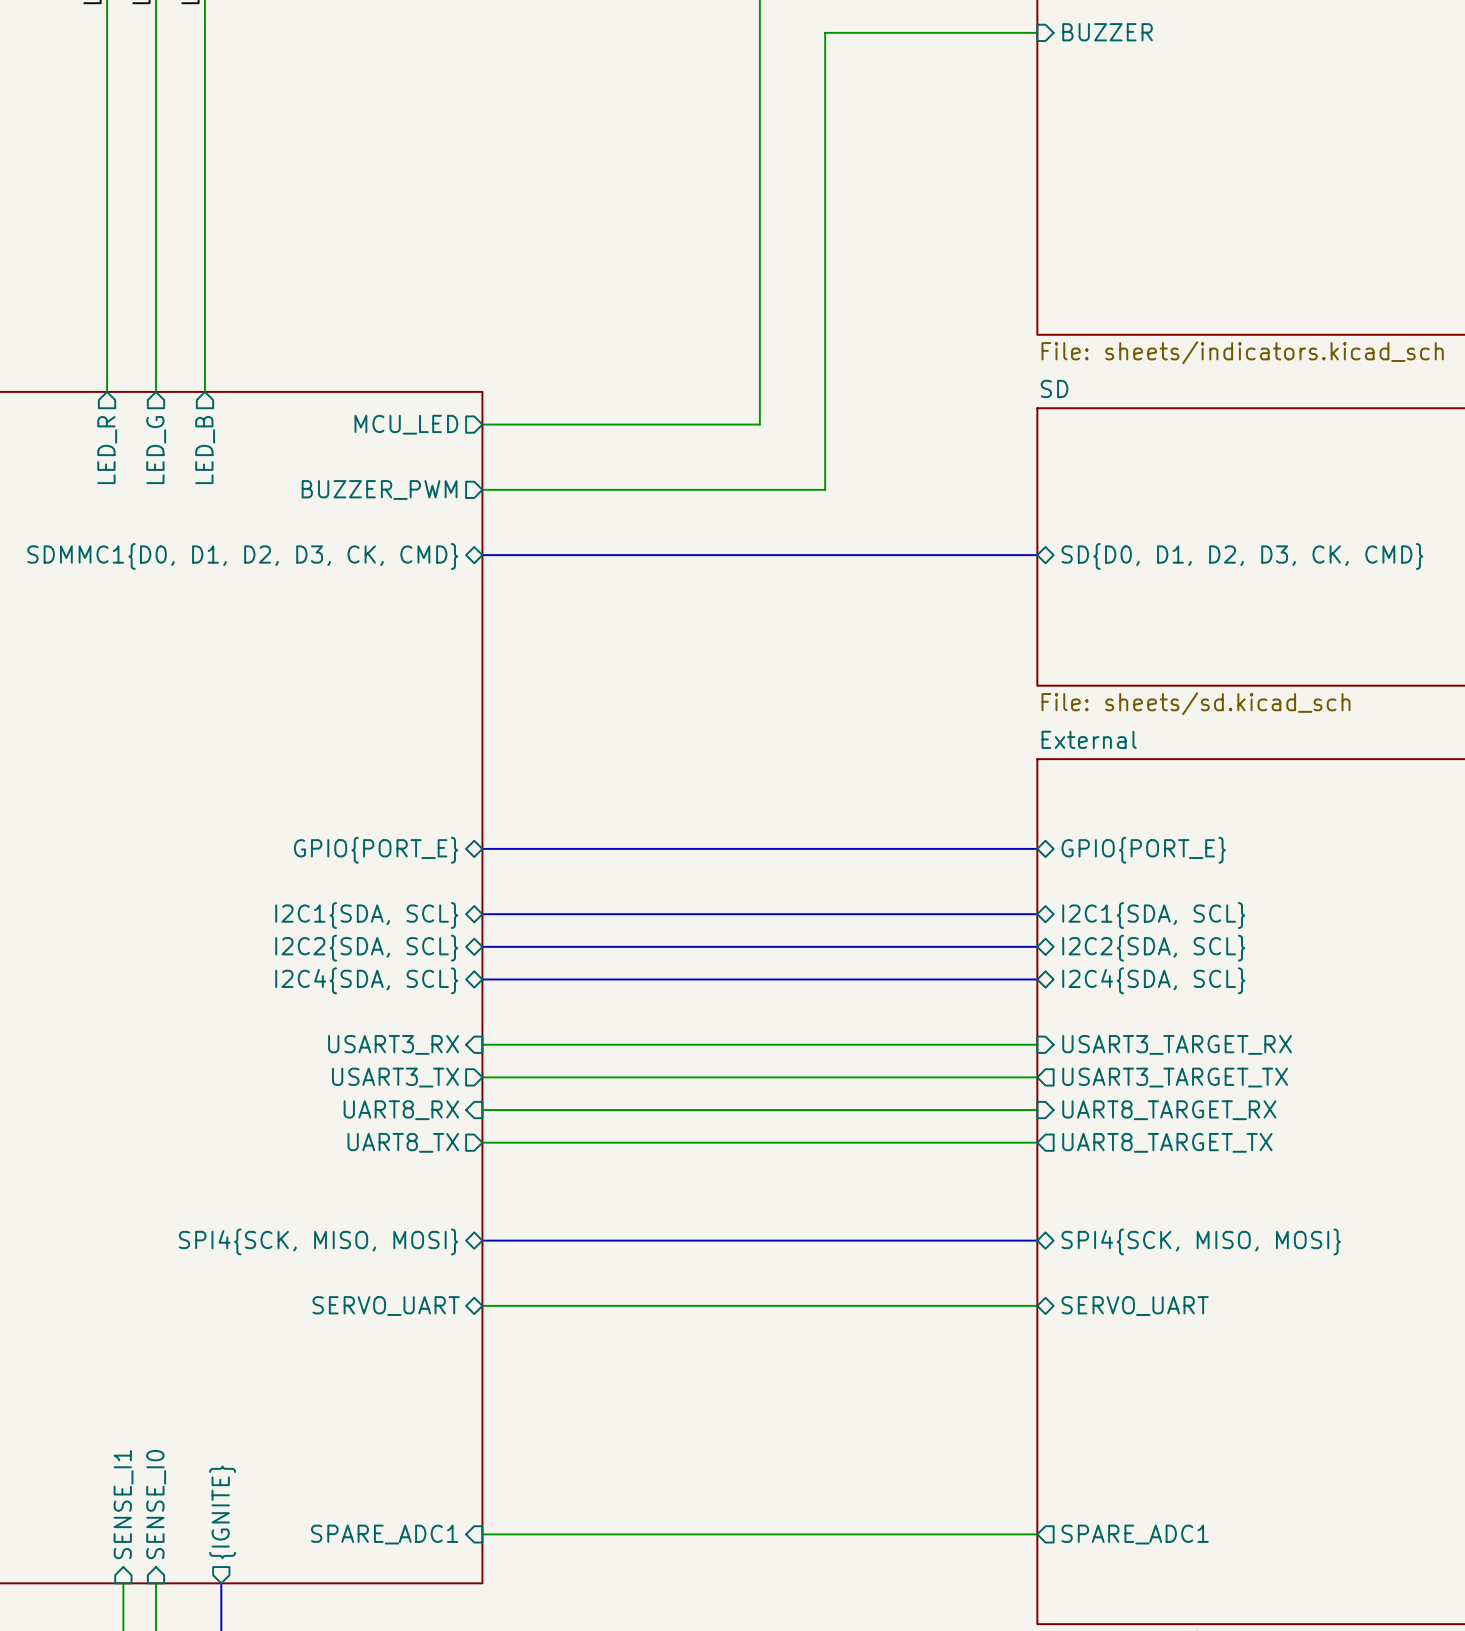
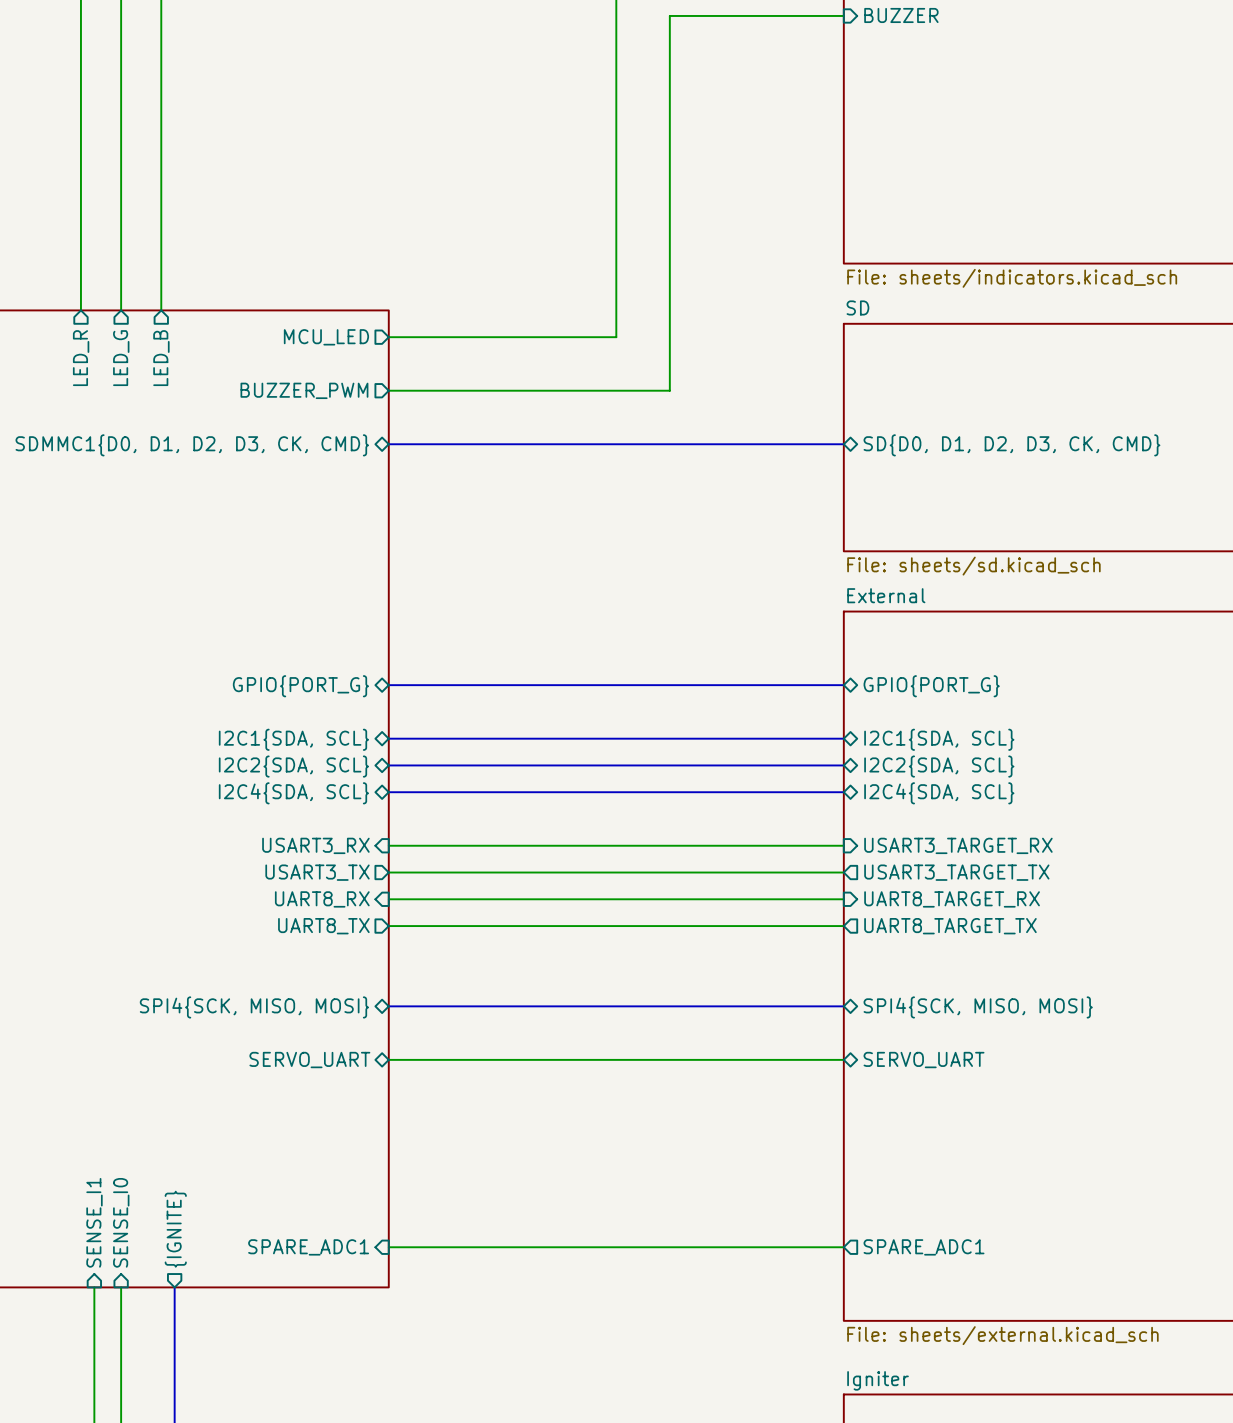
sheet pin: GPIO{PORT_E} (376, 850) -> GPIO{PORT_G} (300, 686)
sheet pin: GPIO{PORT_E} (1143, 850) -> GPIO{PORT_G} (931, 686)

